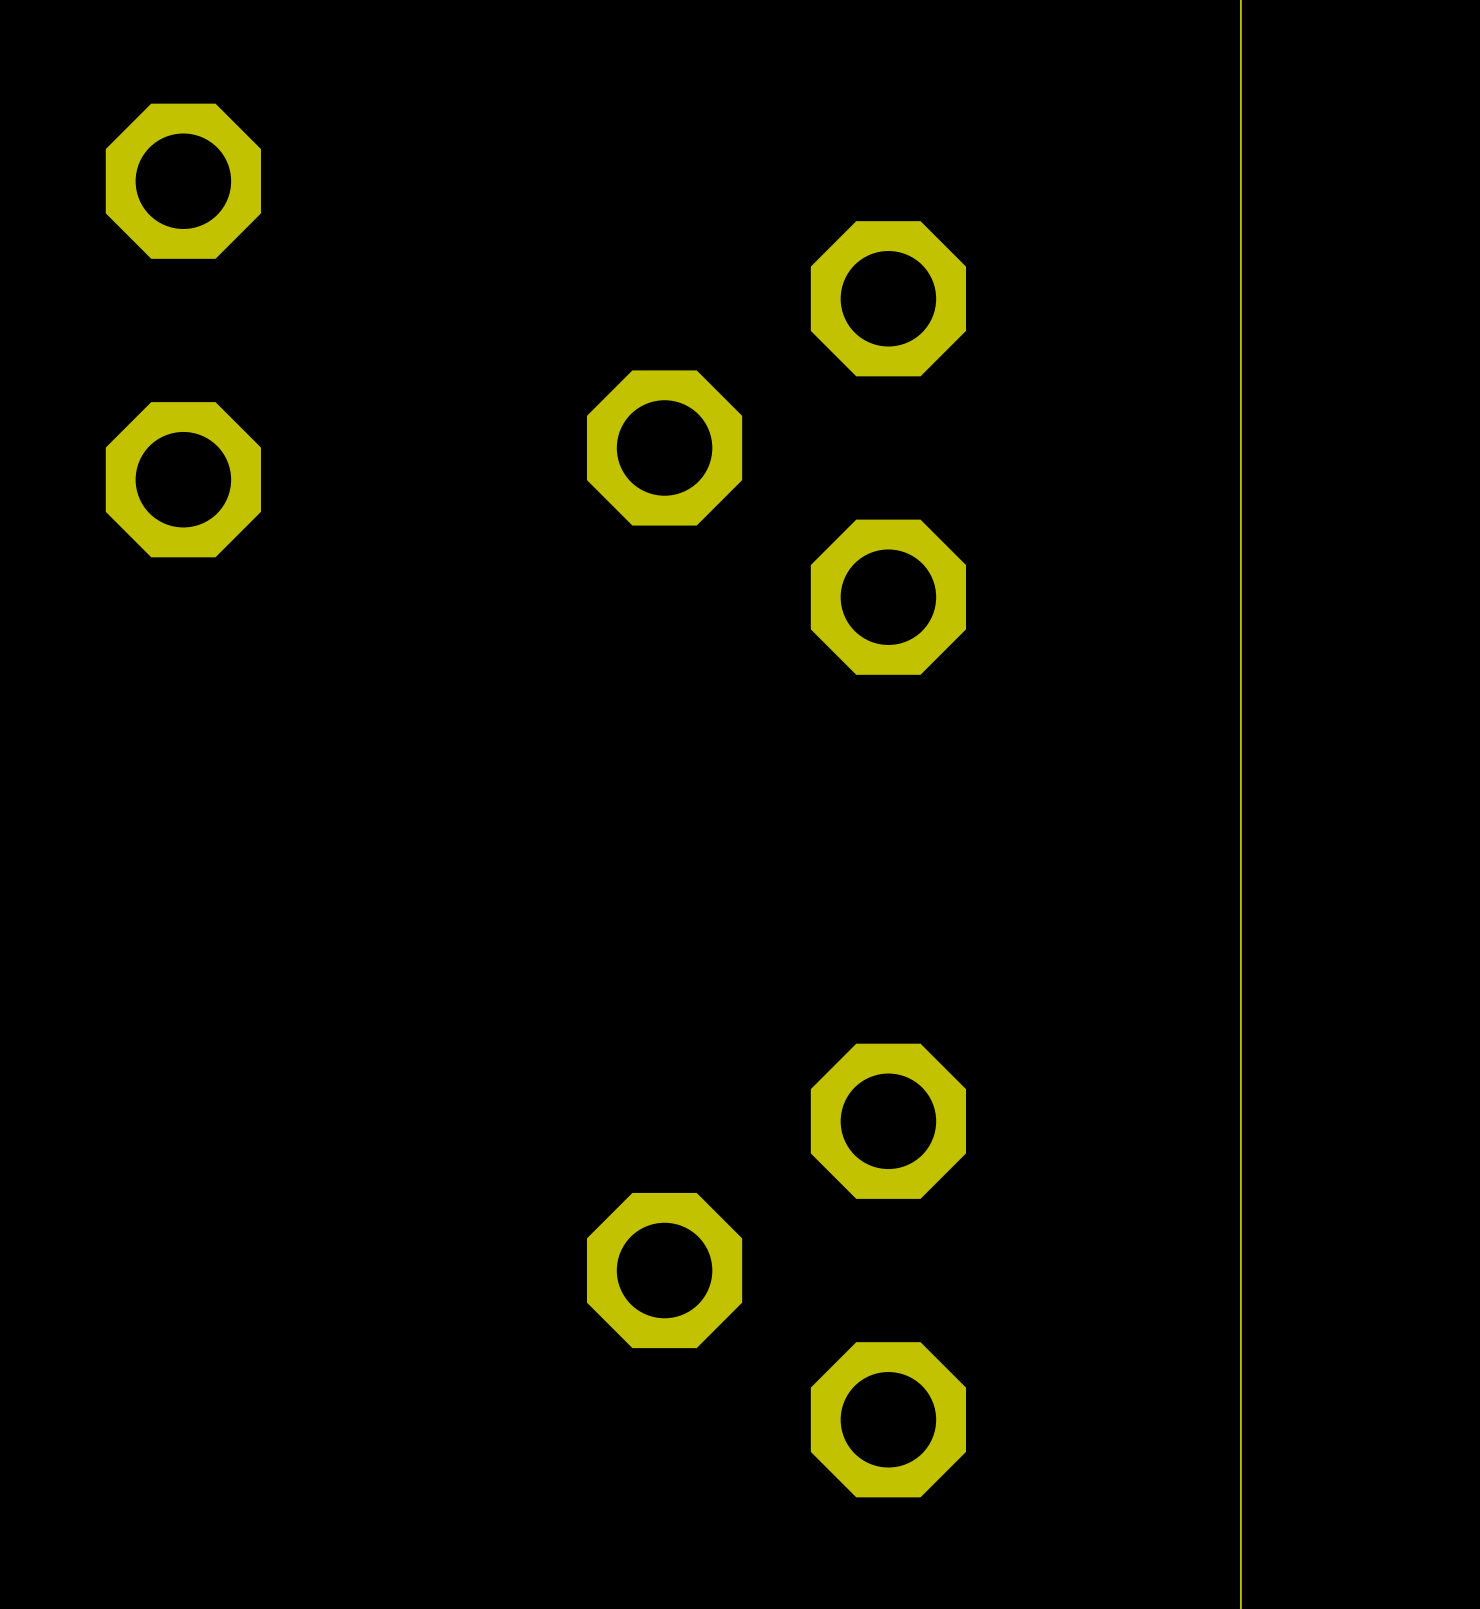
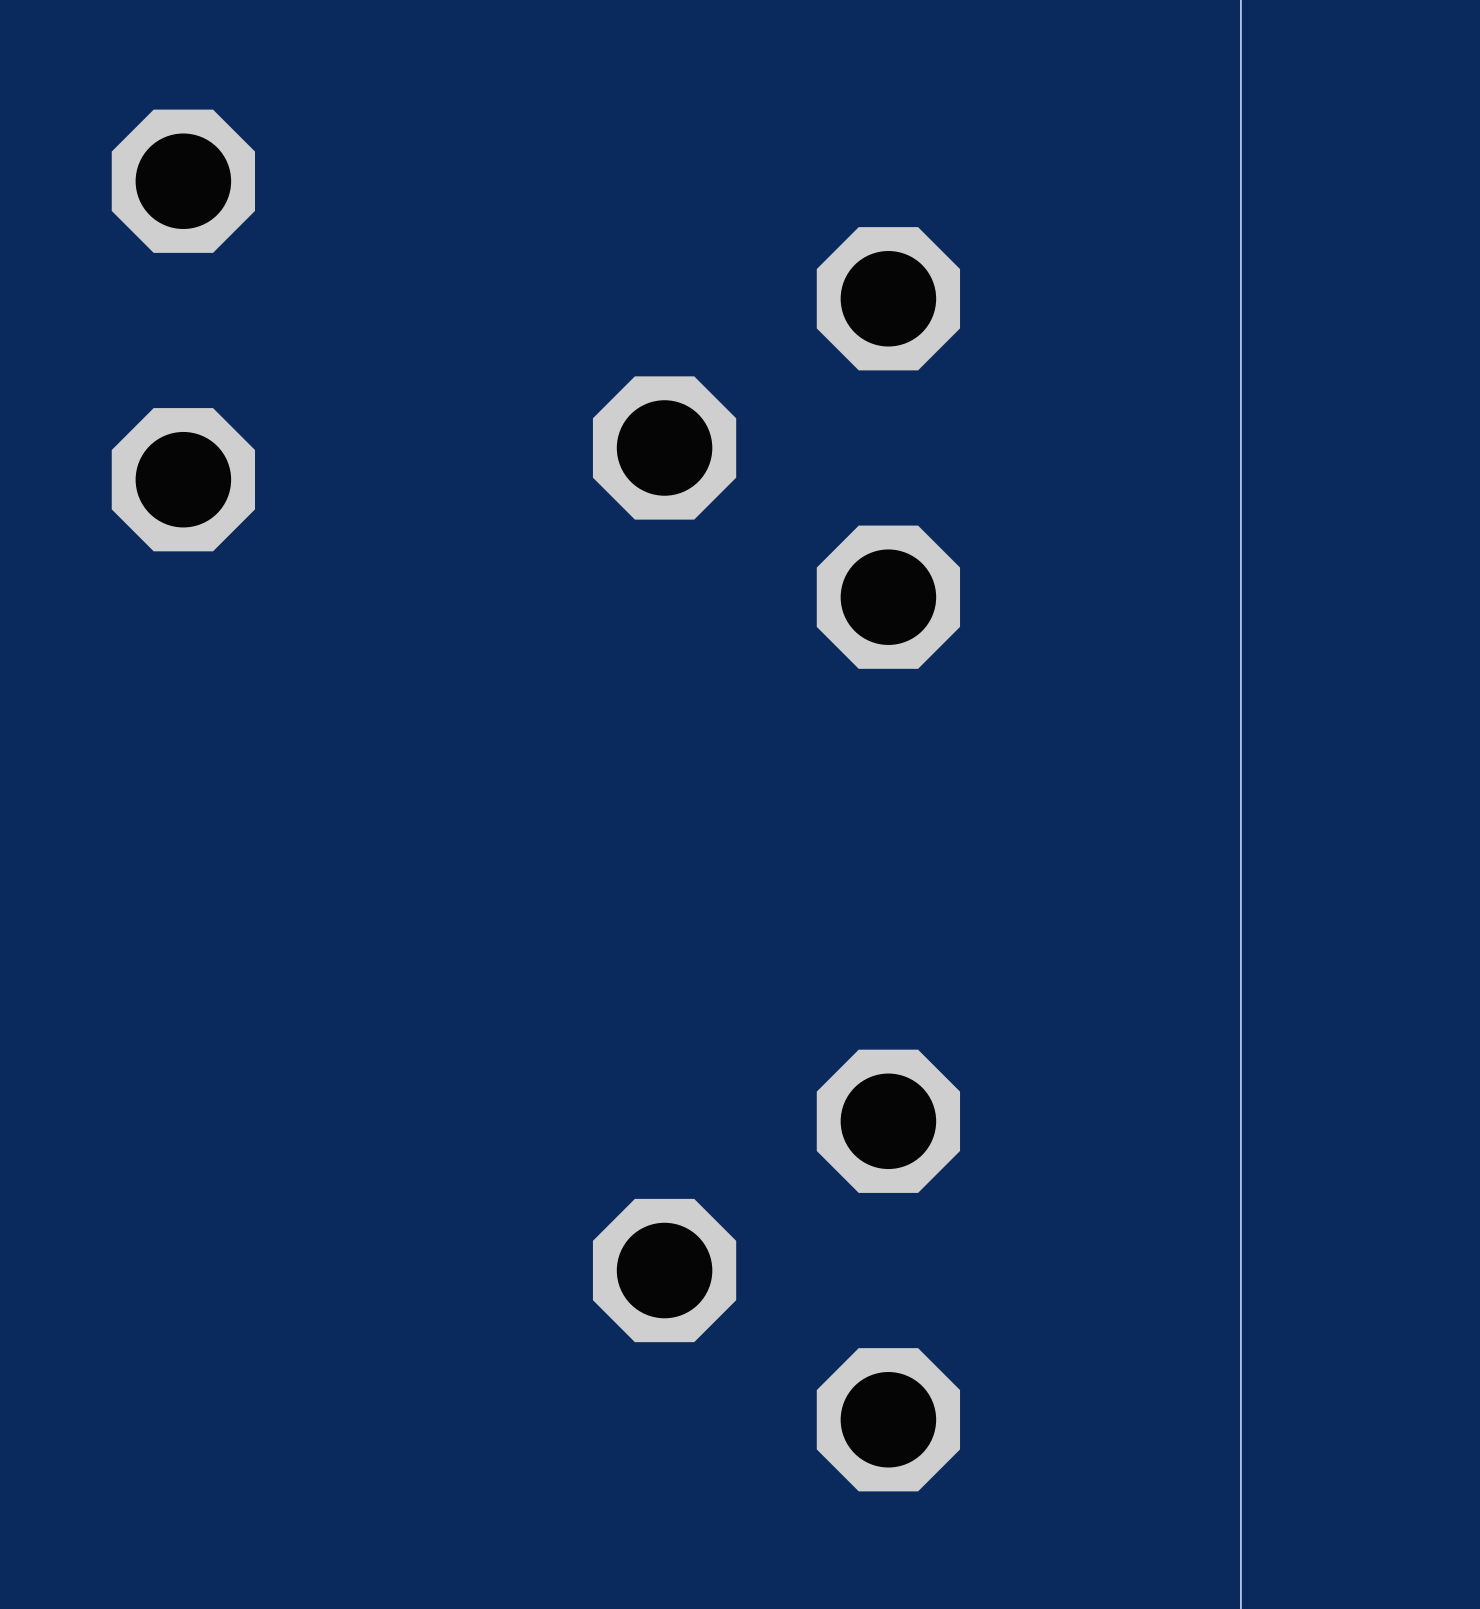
part footprint: [105, 103, 261, 558] -> [111, 109, 256, 552]
part footprint: [586, 221, 967, 675] -> [592, 227, 961, 669]
part footprint: [586, 1043, 967, 1498] -> [592, 1049, 961, 1492]

